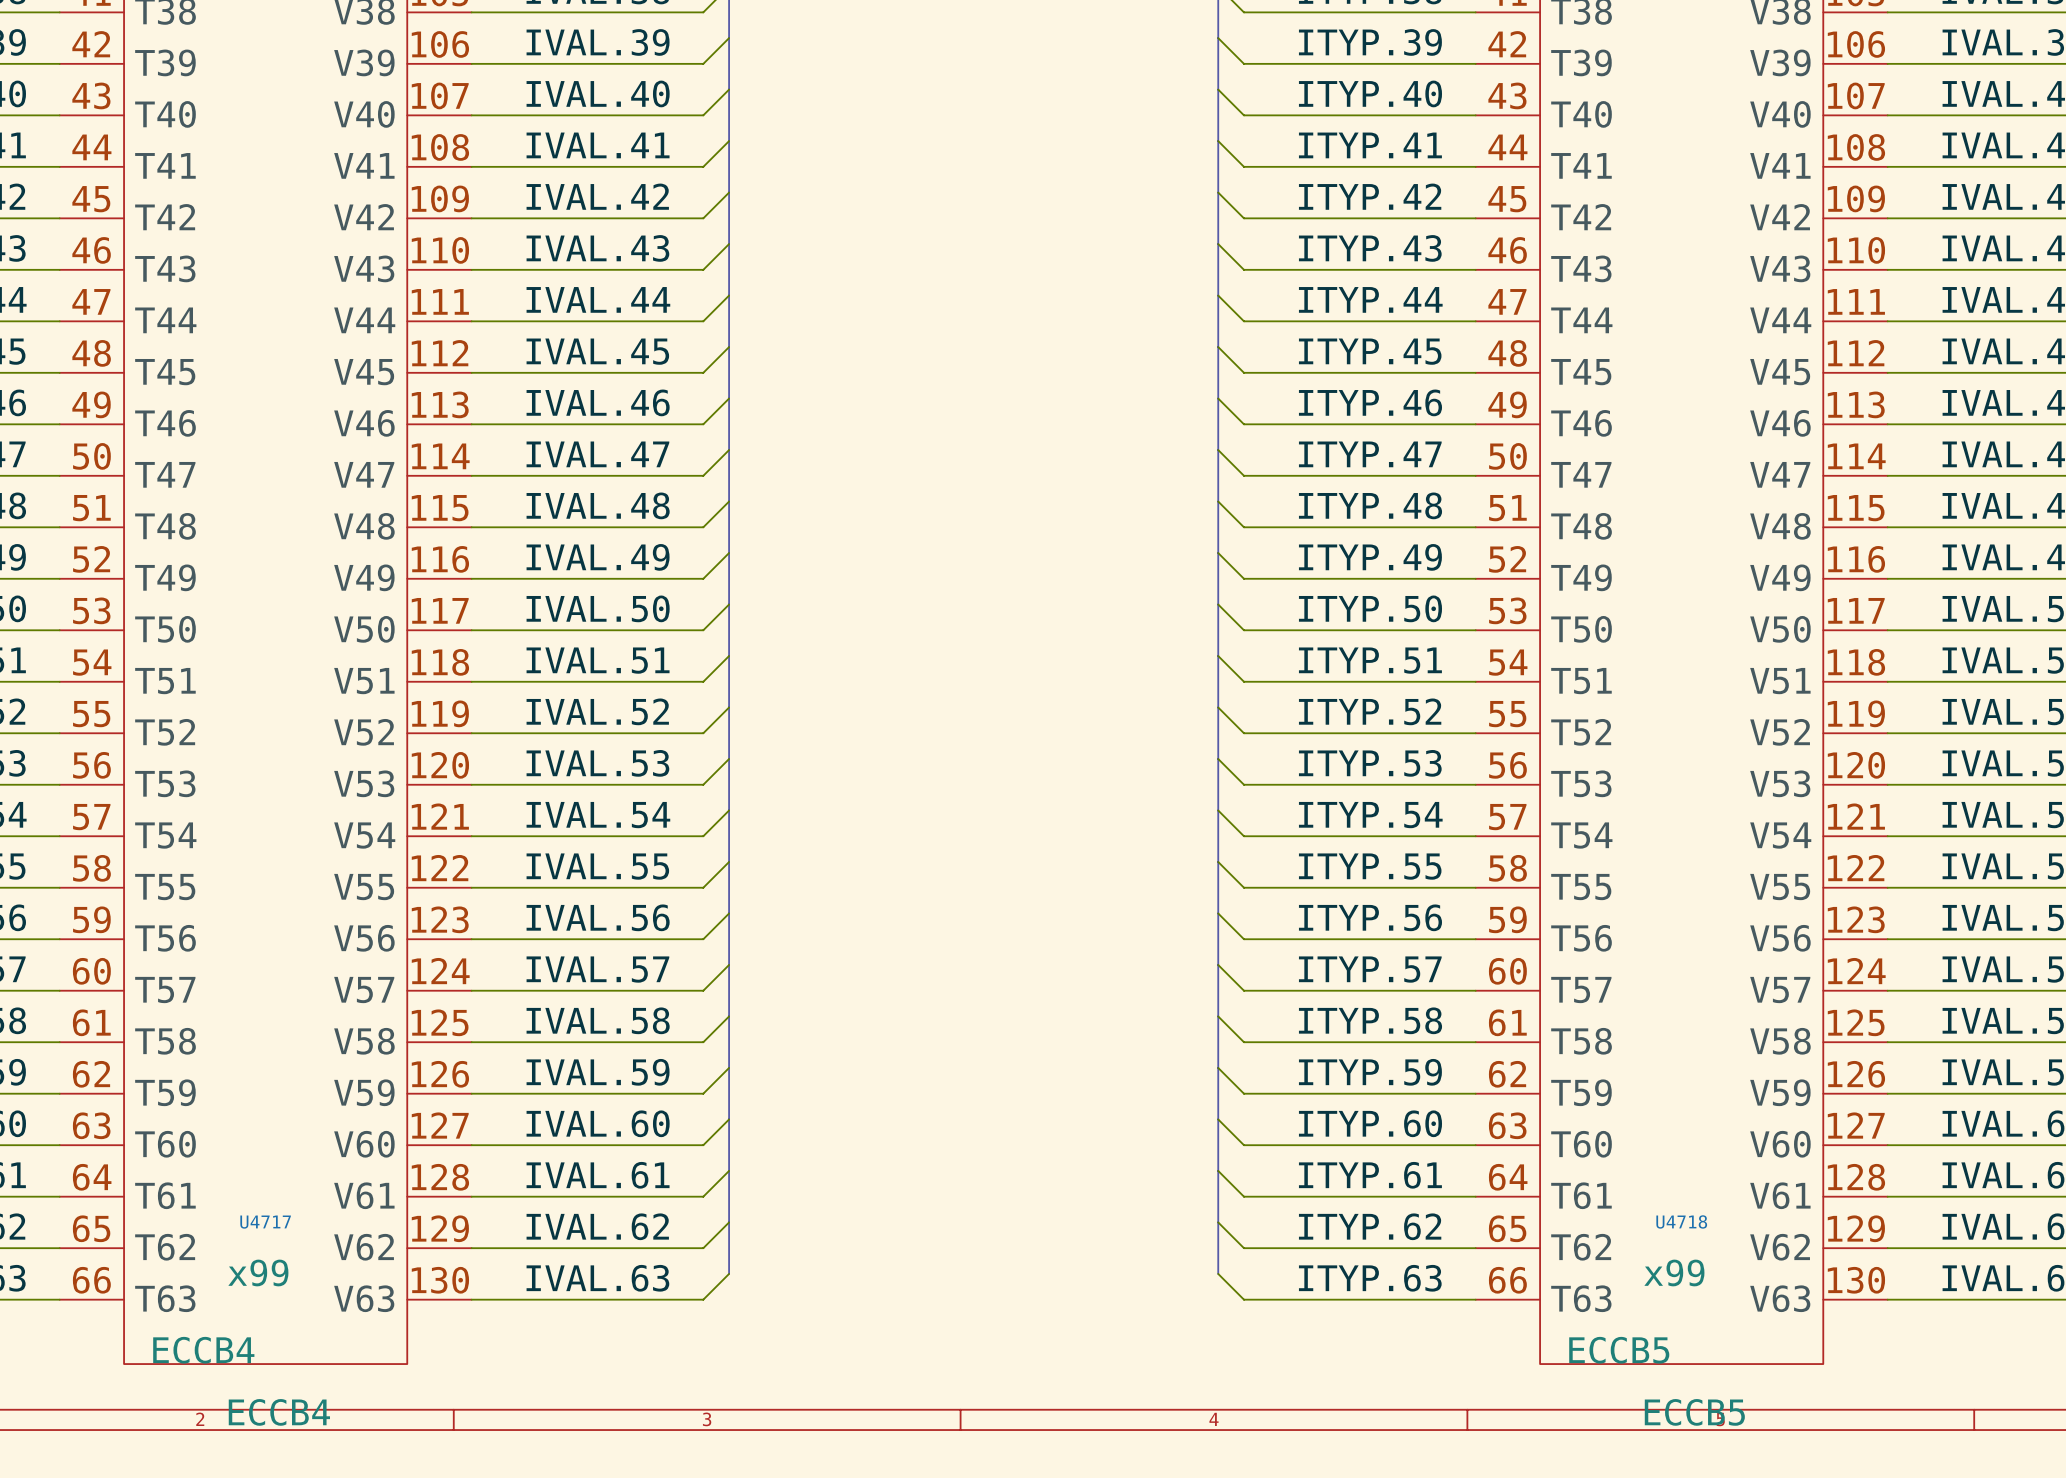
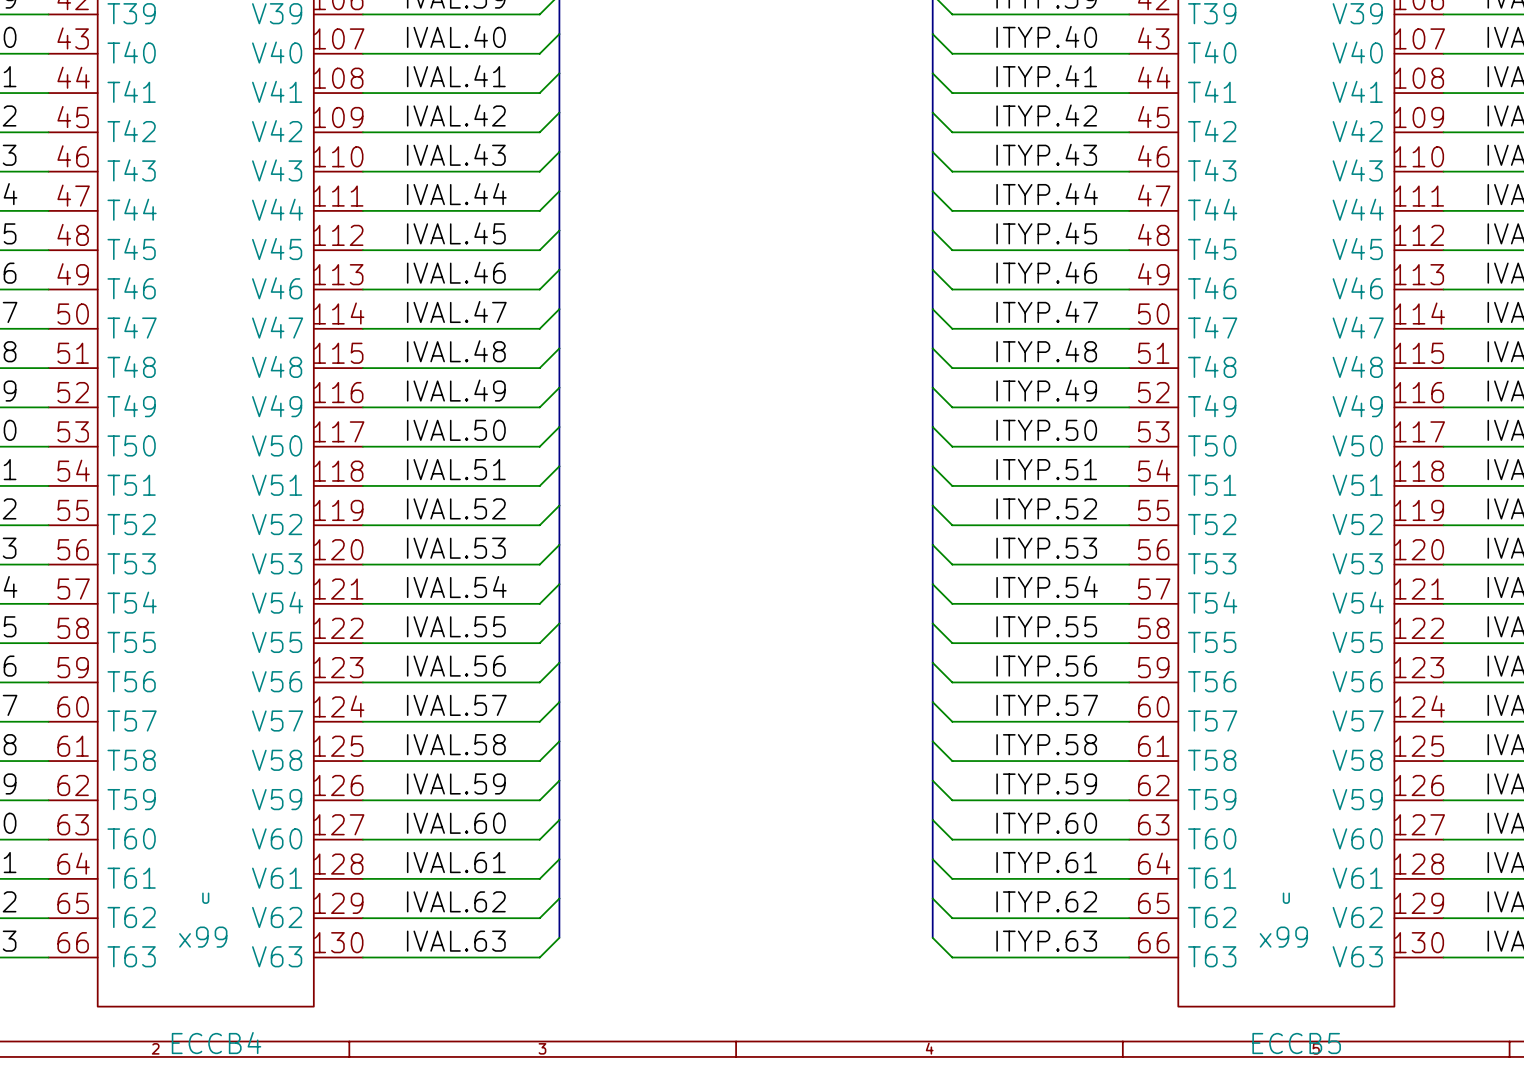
U4718 name: U4718 (1681, 1221) -> U (1286, 898)
U4717 name: U4717 (265, 1222) -> U (205, 898)
U4717 value: ECCB4 (203, 1350) -> none
U4718 value: ECCB5 (1619, 1350) -> none

